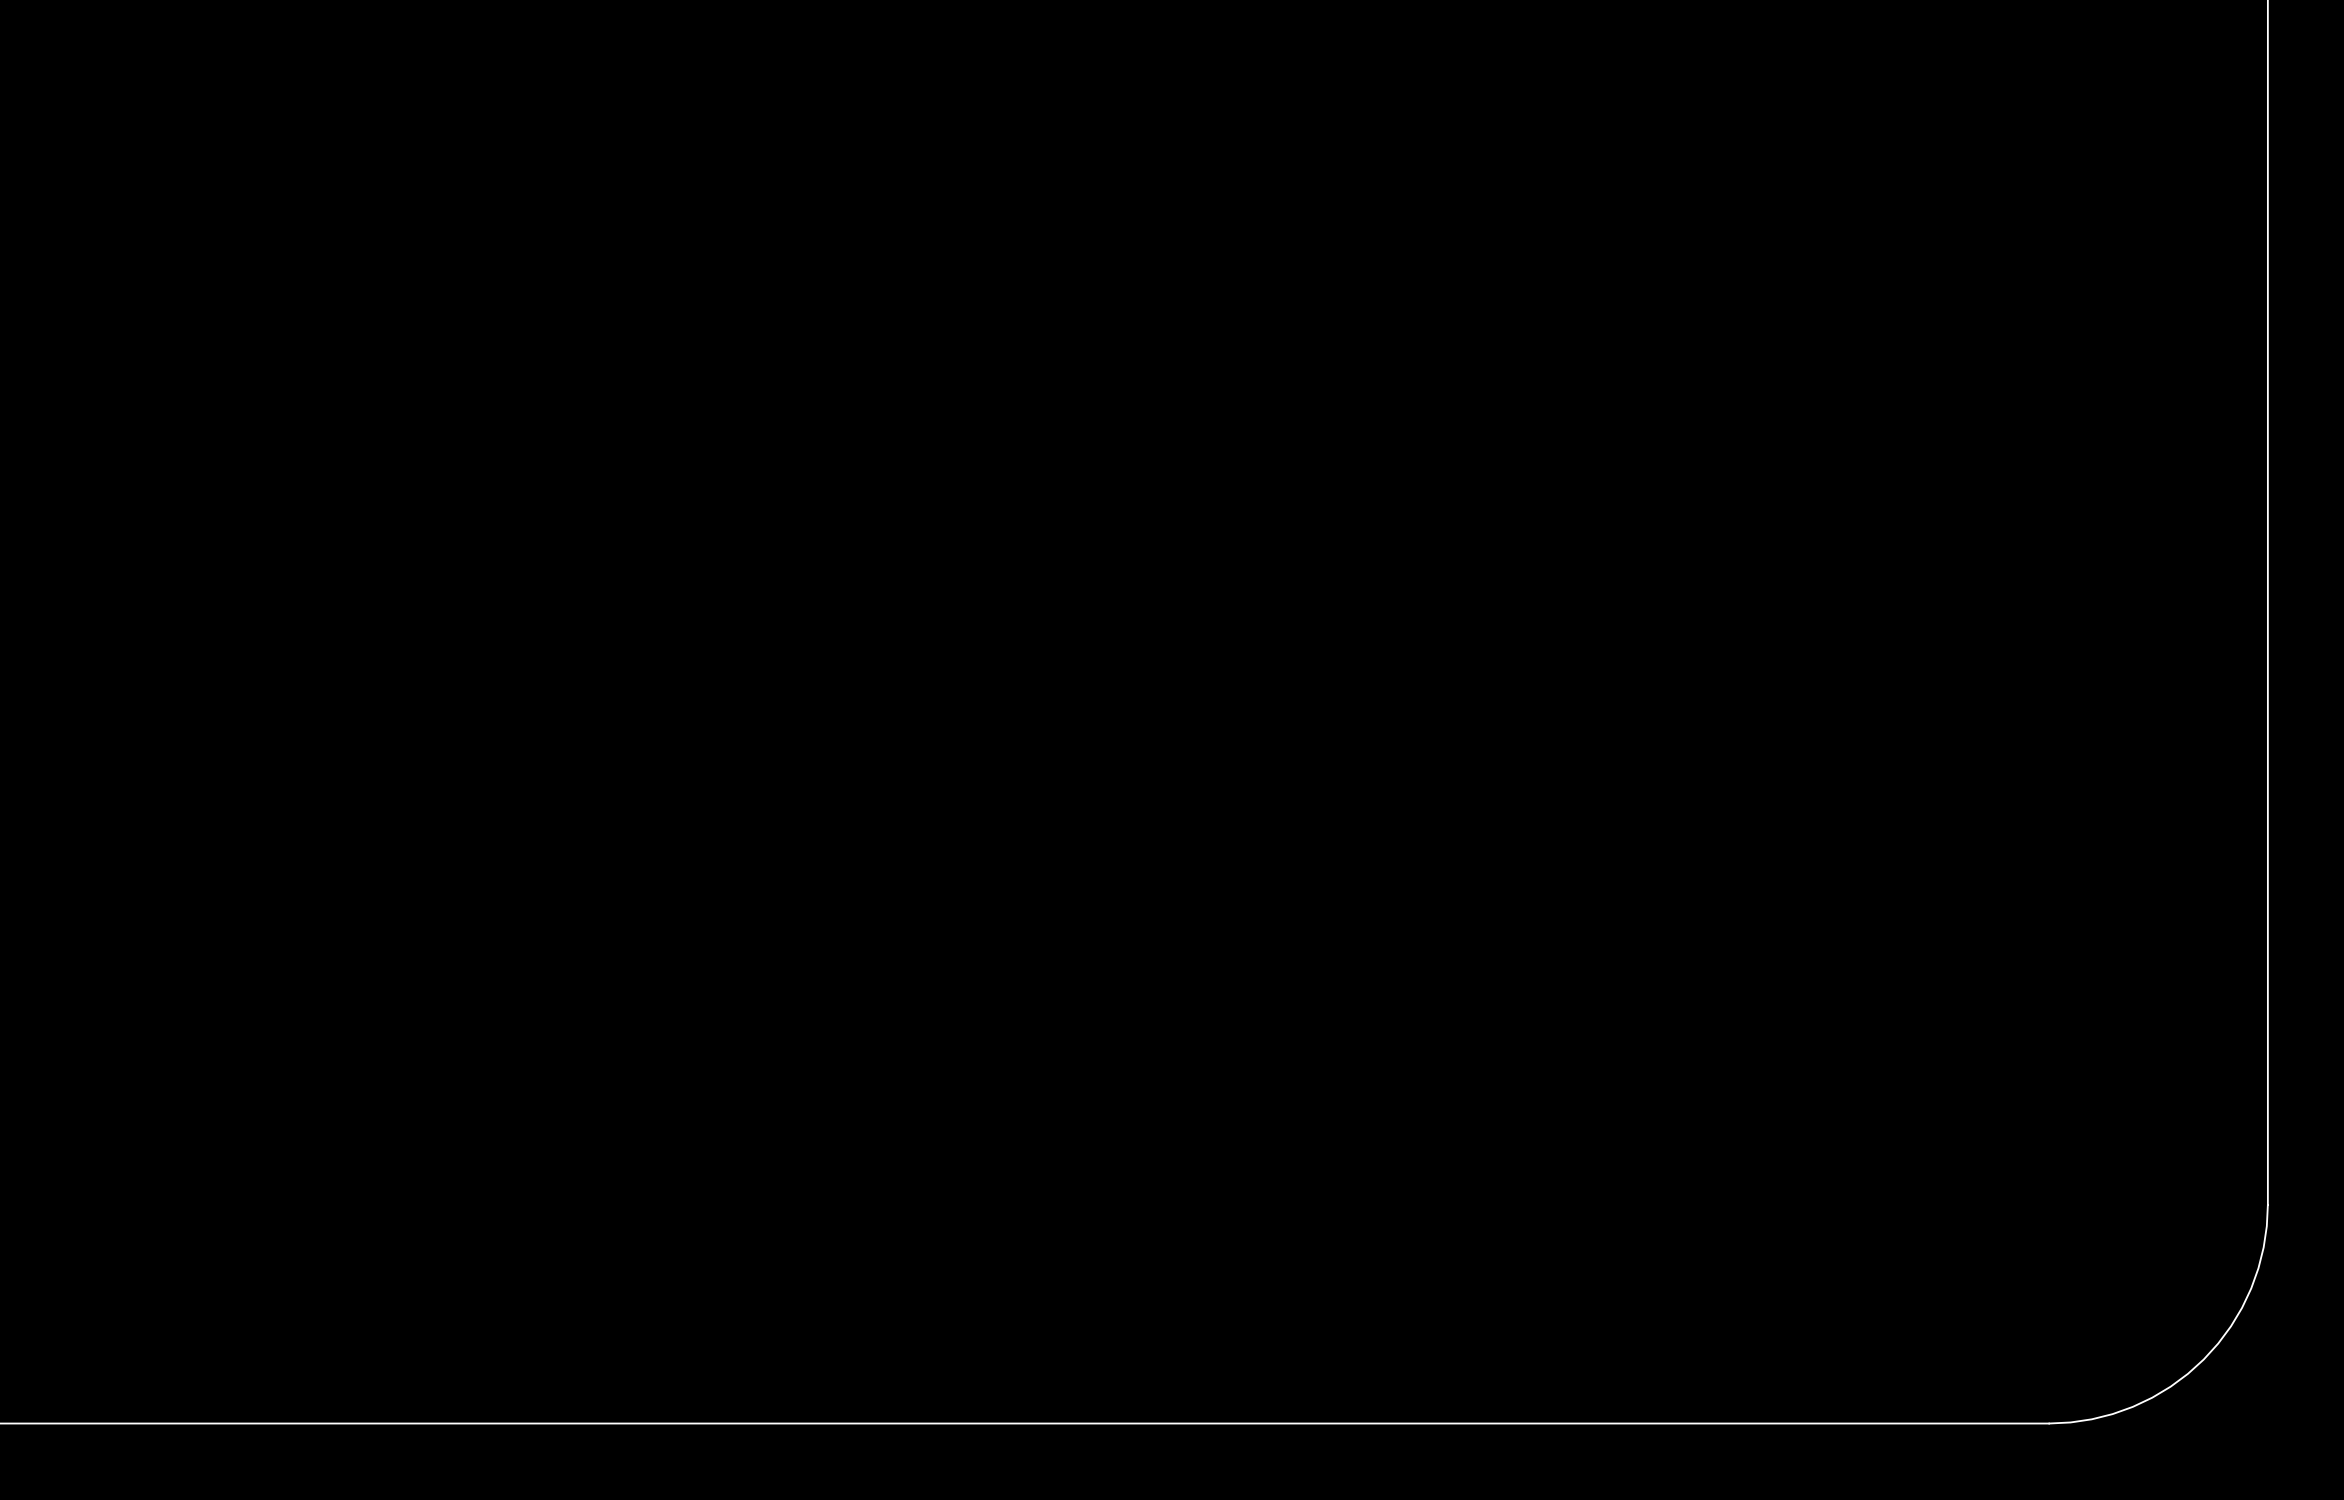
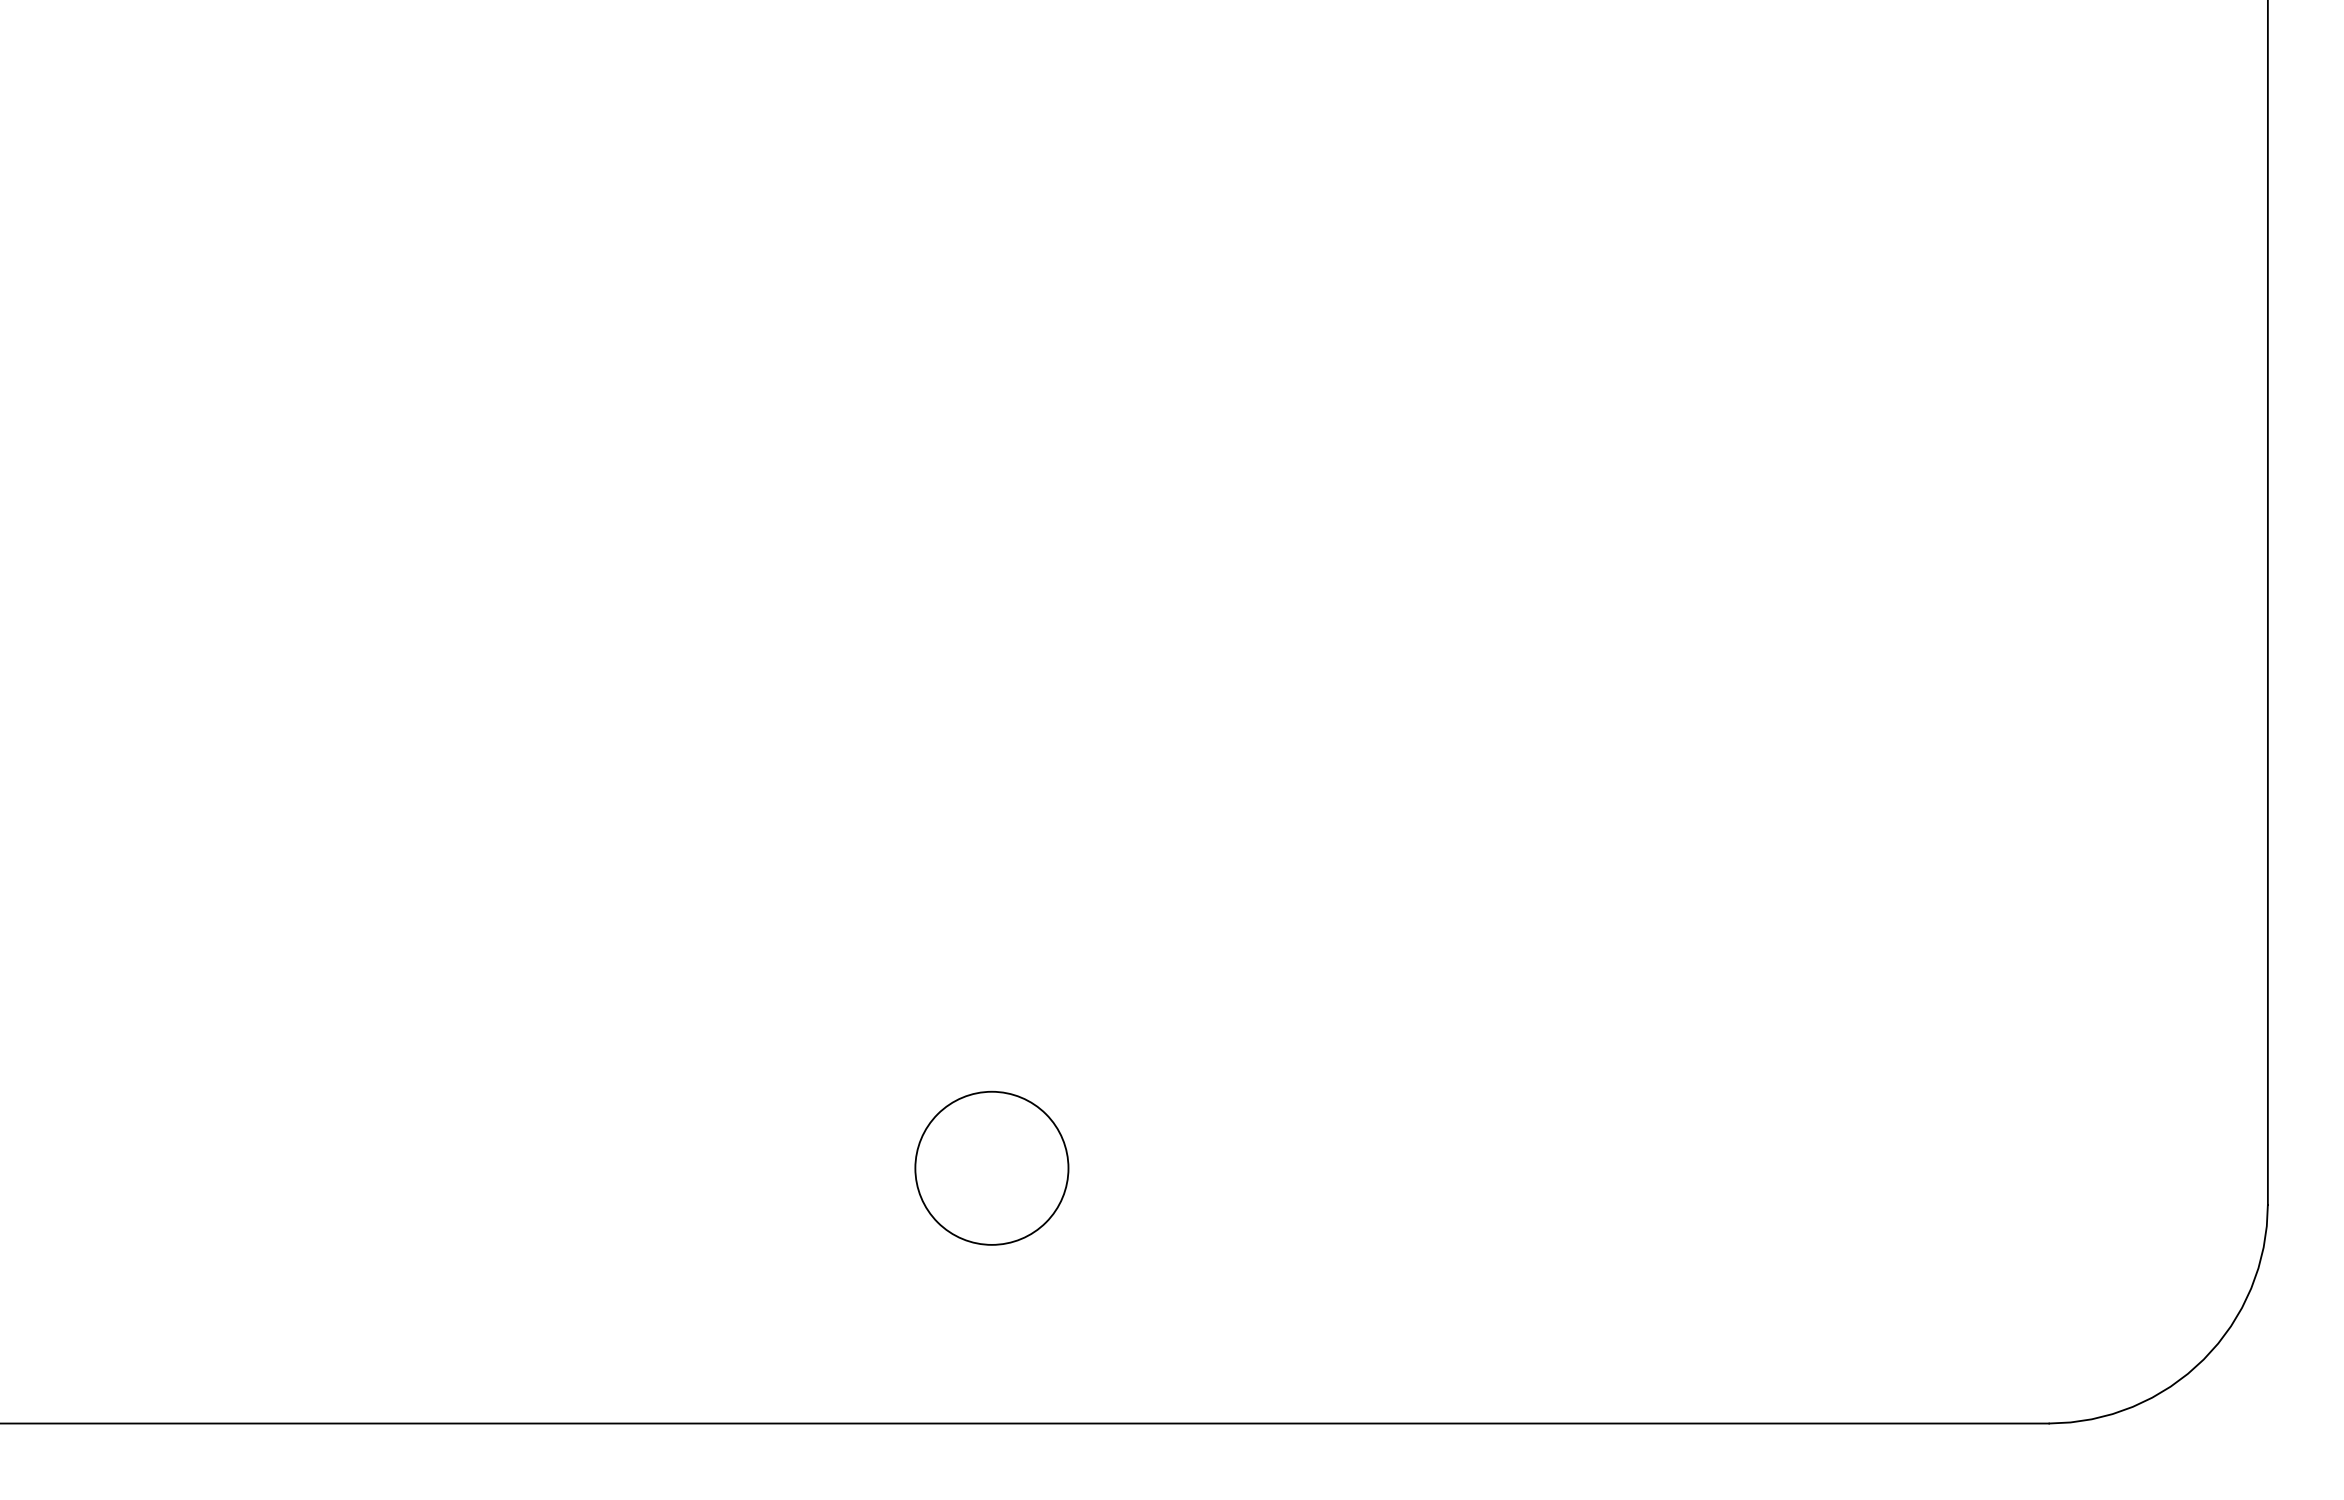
round board edge: none -> [914, 1090, 1070, 1246]

